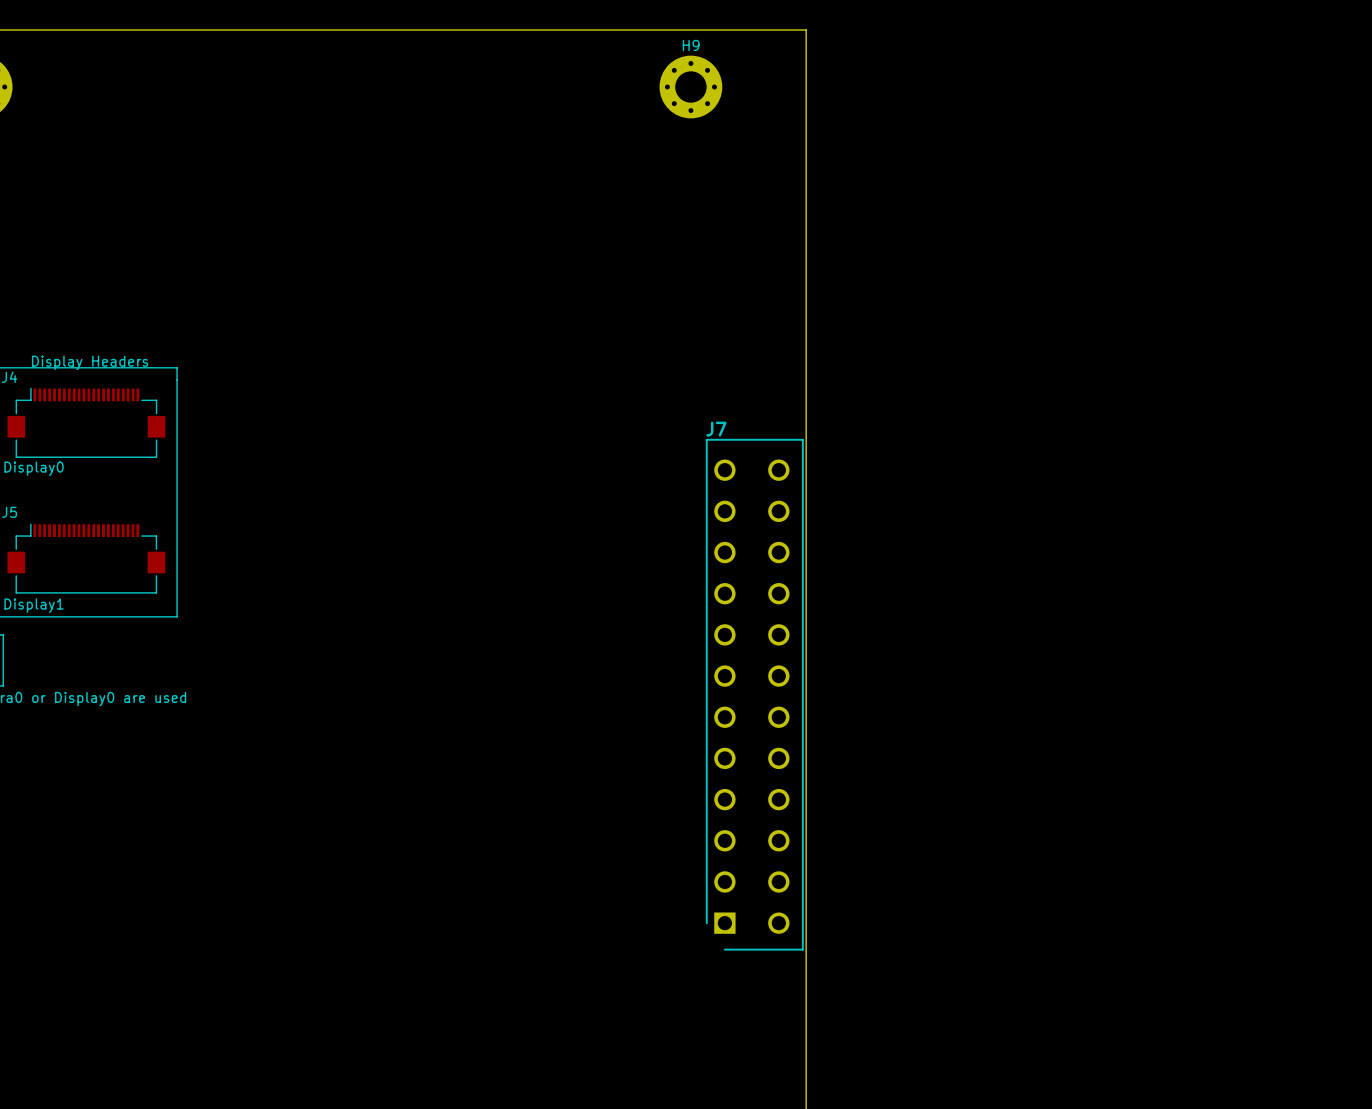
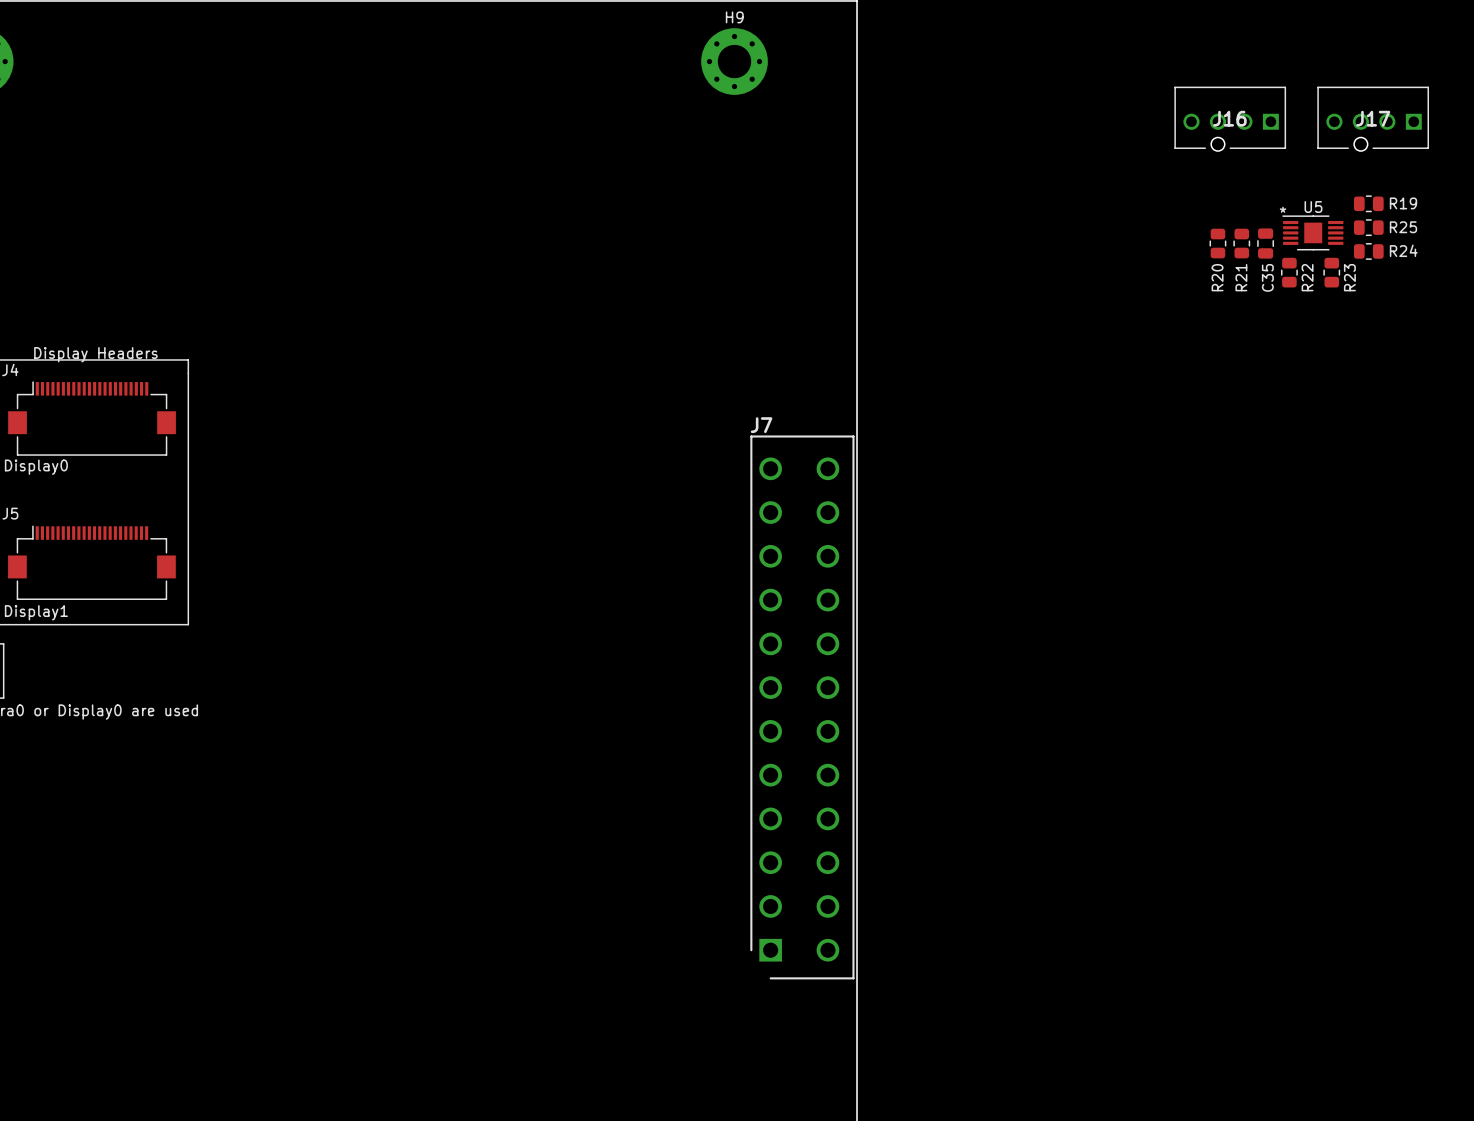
J16: none -> (1230, 118)
J17: none -> (1373, 118)
R19: none -> (1368, 203)
R25: none -> (1368, 227)
U5: none -> (1312, 232)
R20: none -> (1217, 243)
R21: none -> (1241, 243)
C35: none -> (1265, 243)
R24: none -> (1368, 251)
R22: none -> (1289, 272)
R23: none -> (1331, 272)

